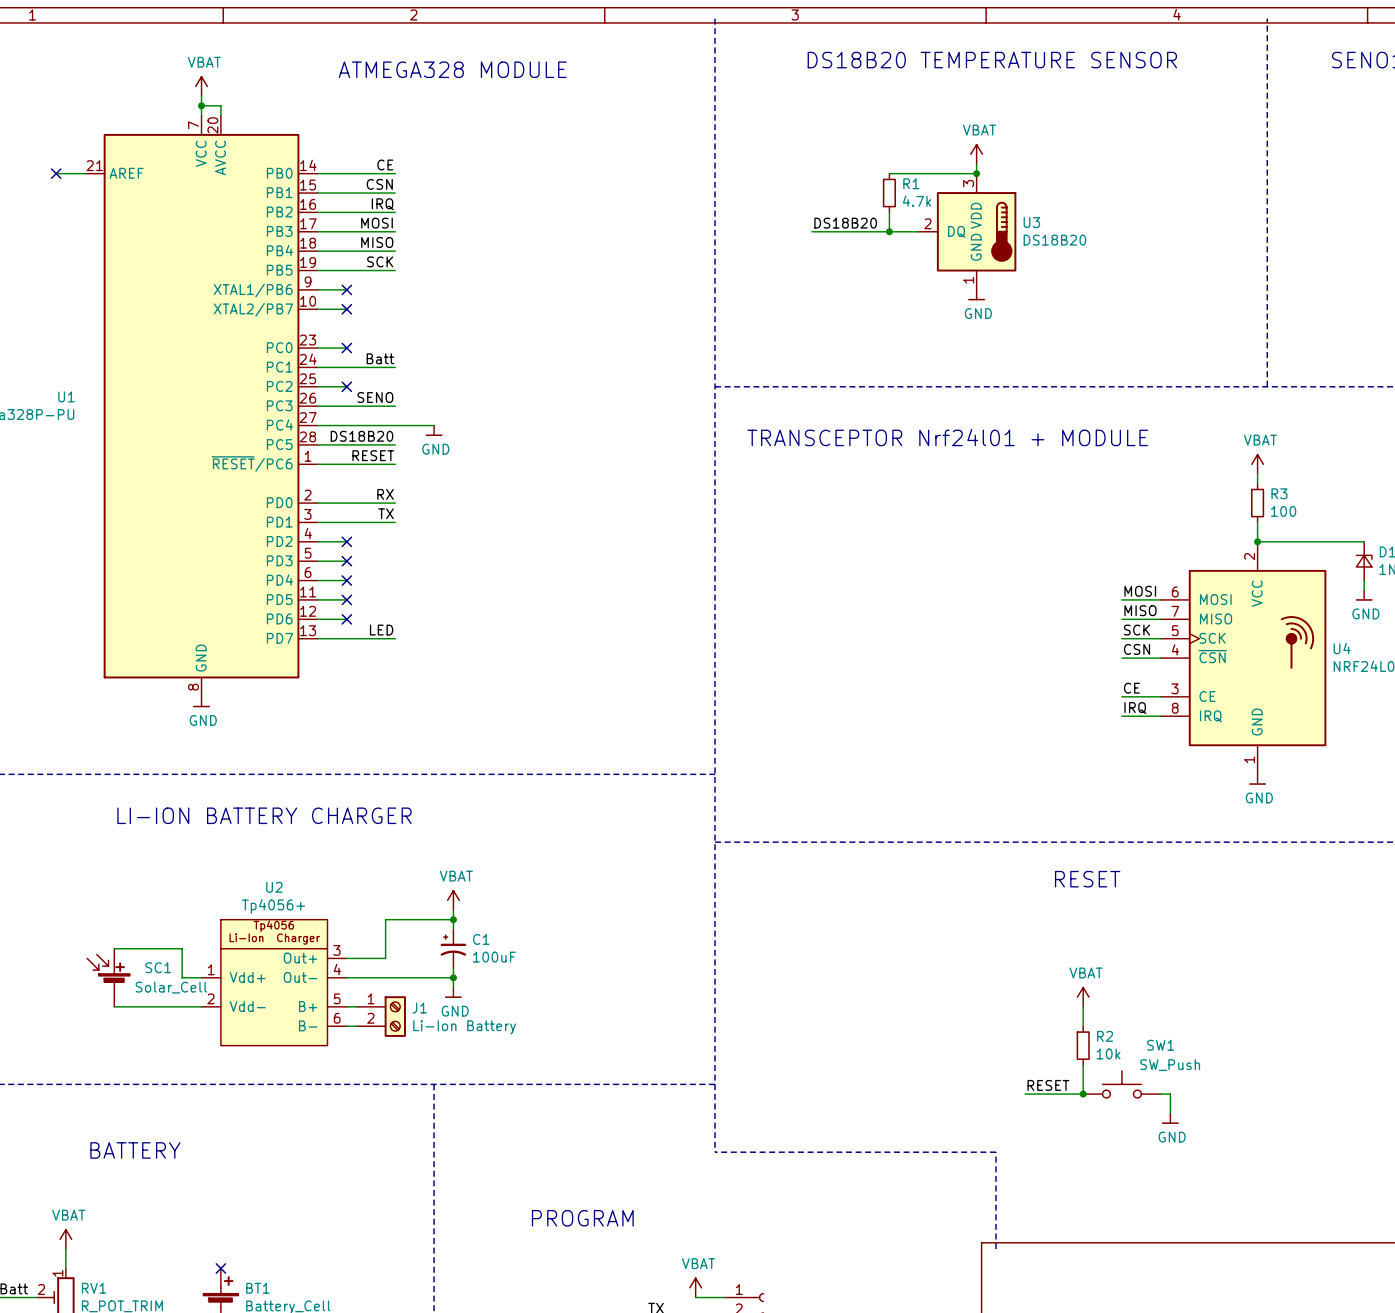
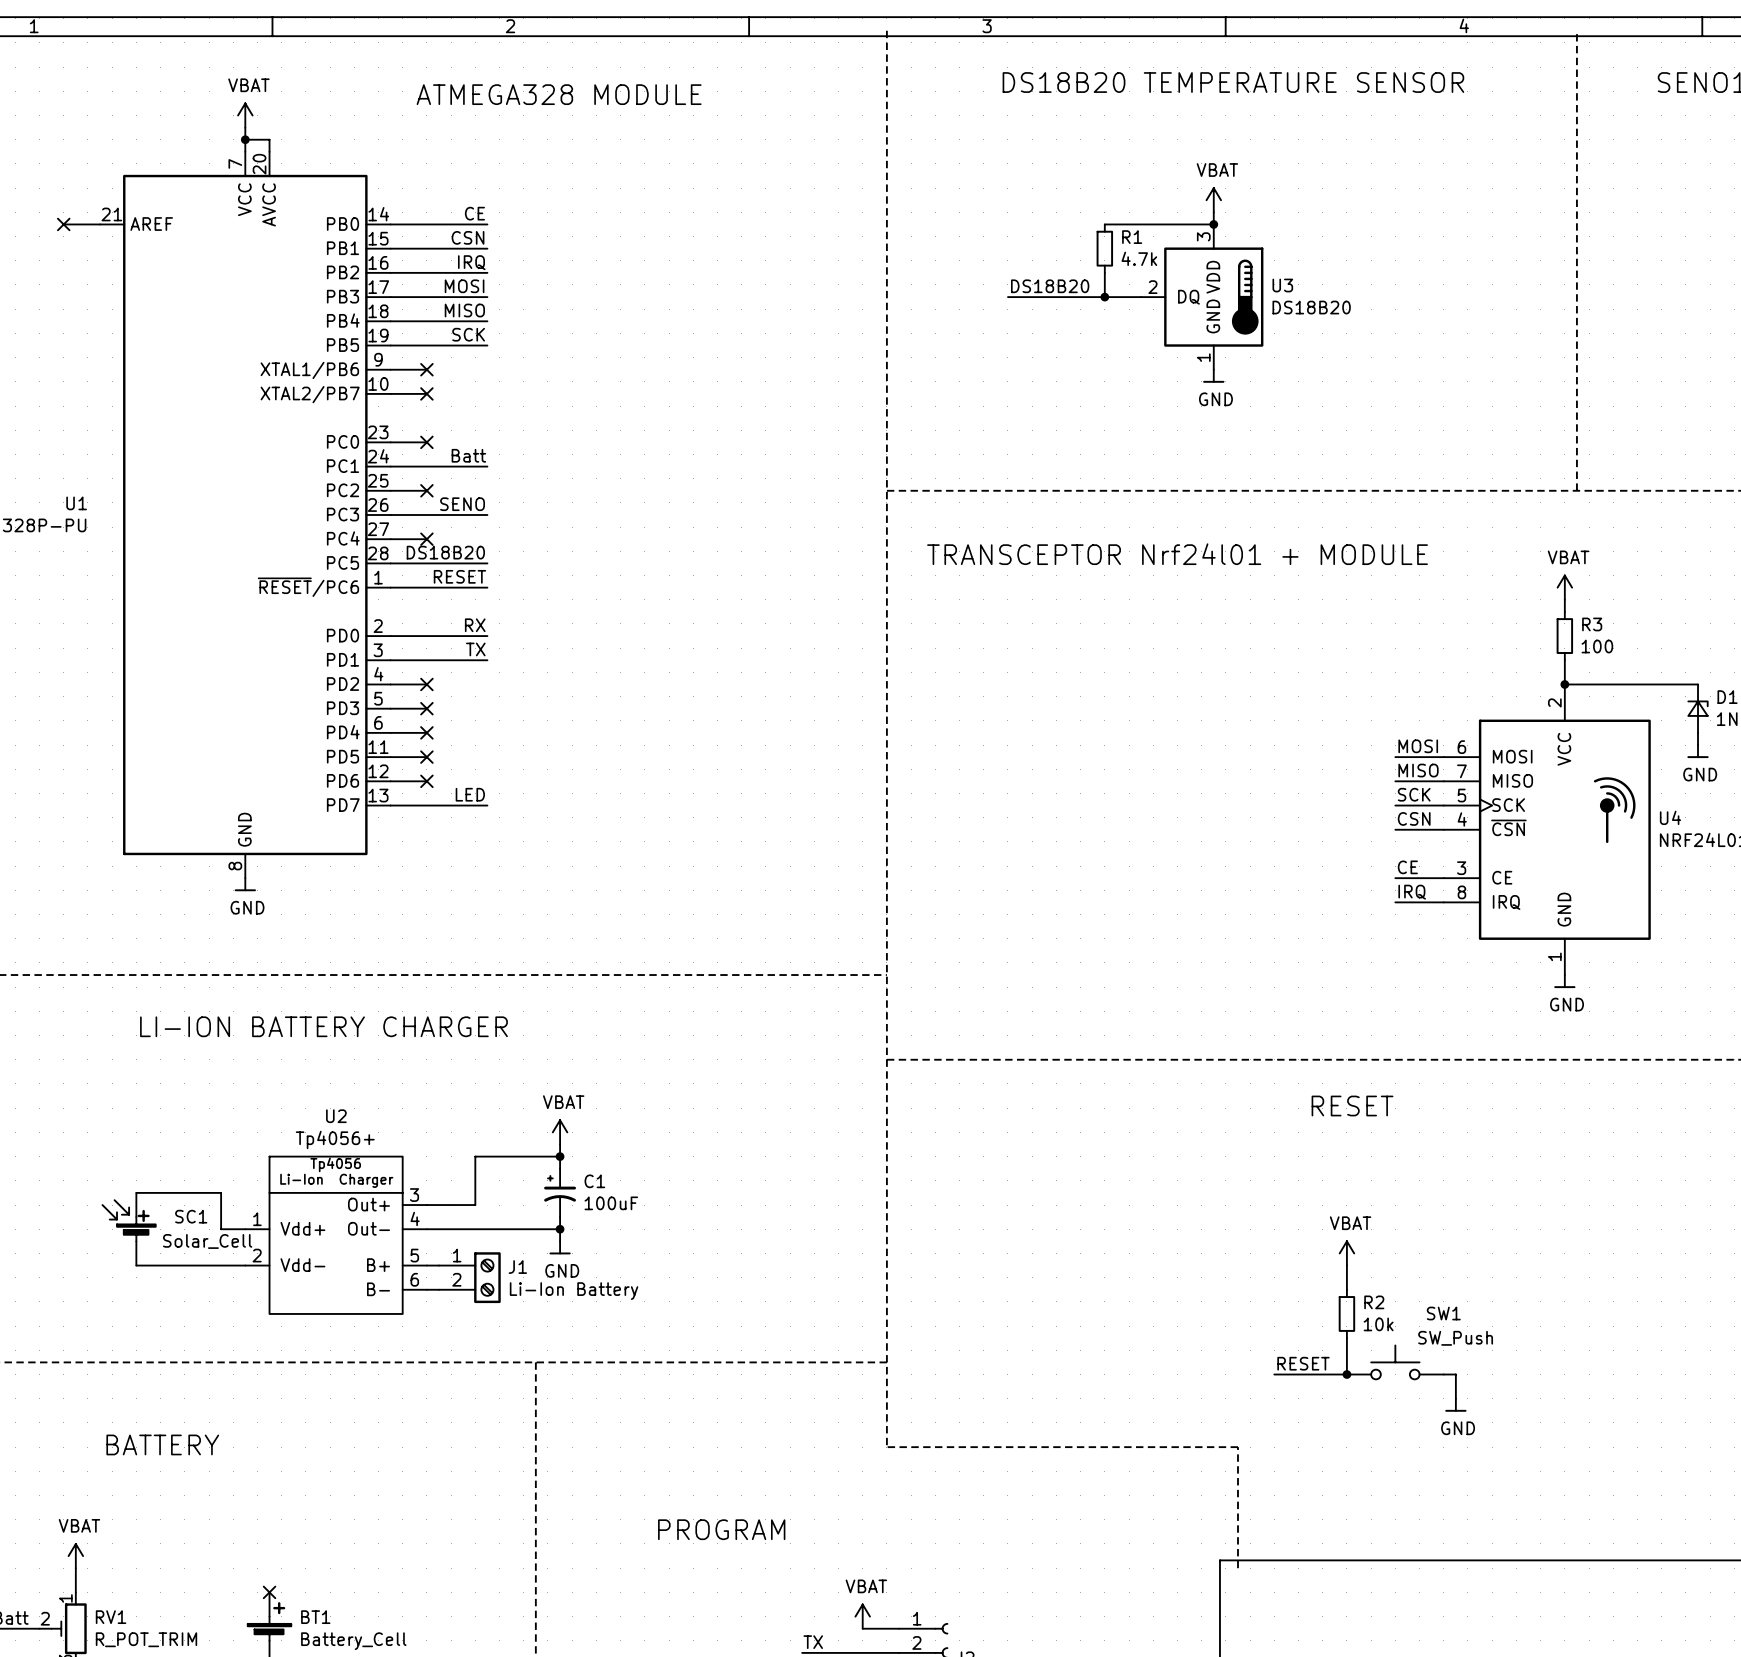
wire: (346, 425) (434, 425) -> none
no-connect mark: none -> (426, 539)
power symbol: GND (434, 430) -> none

